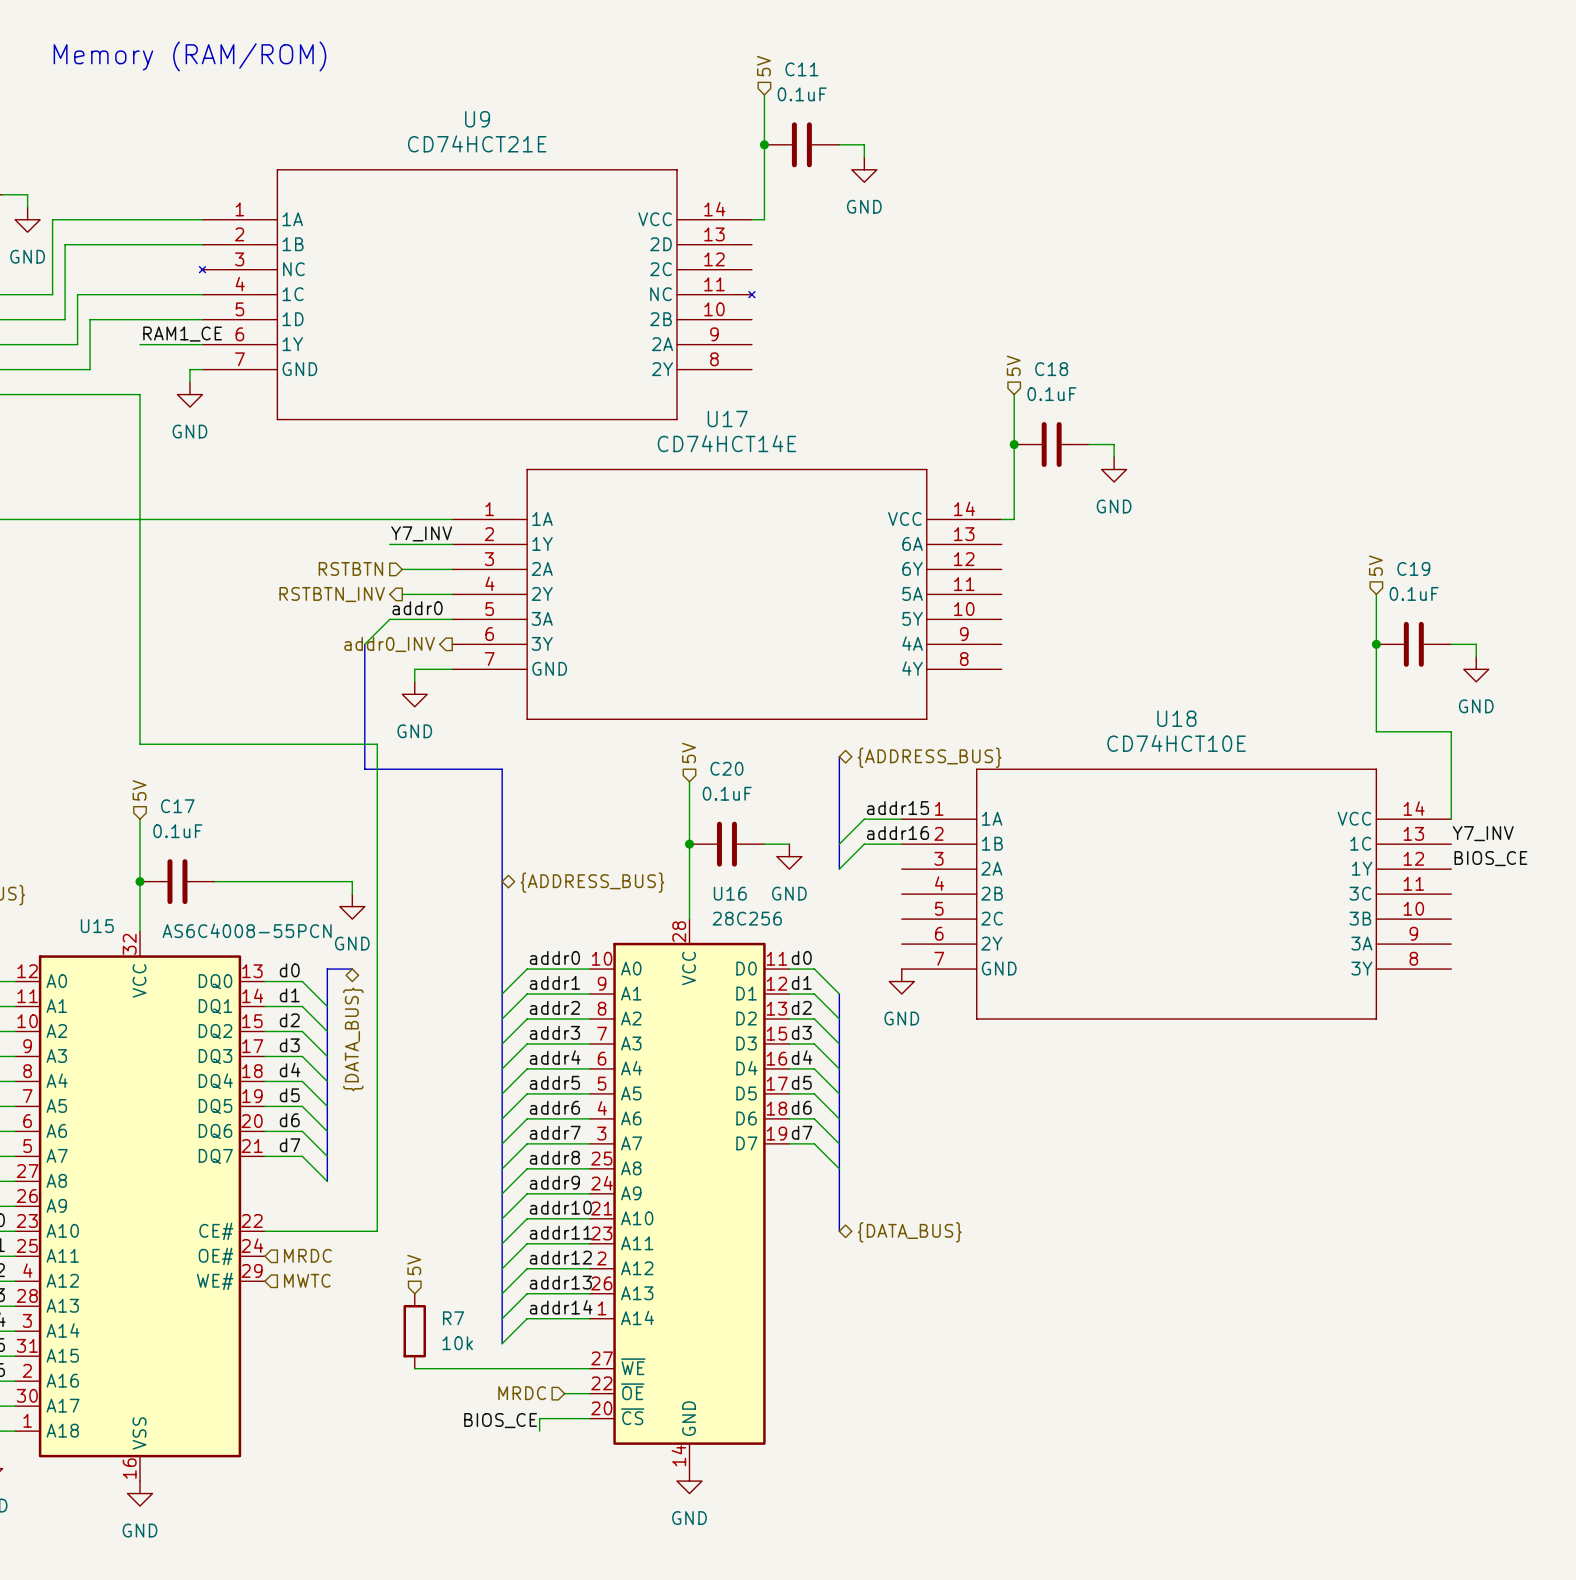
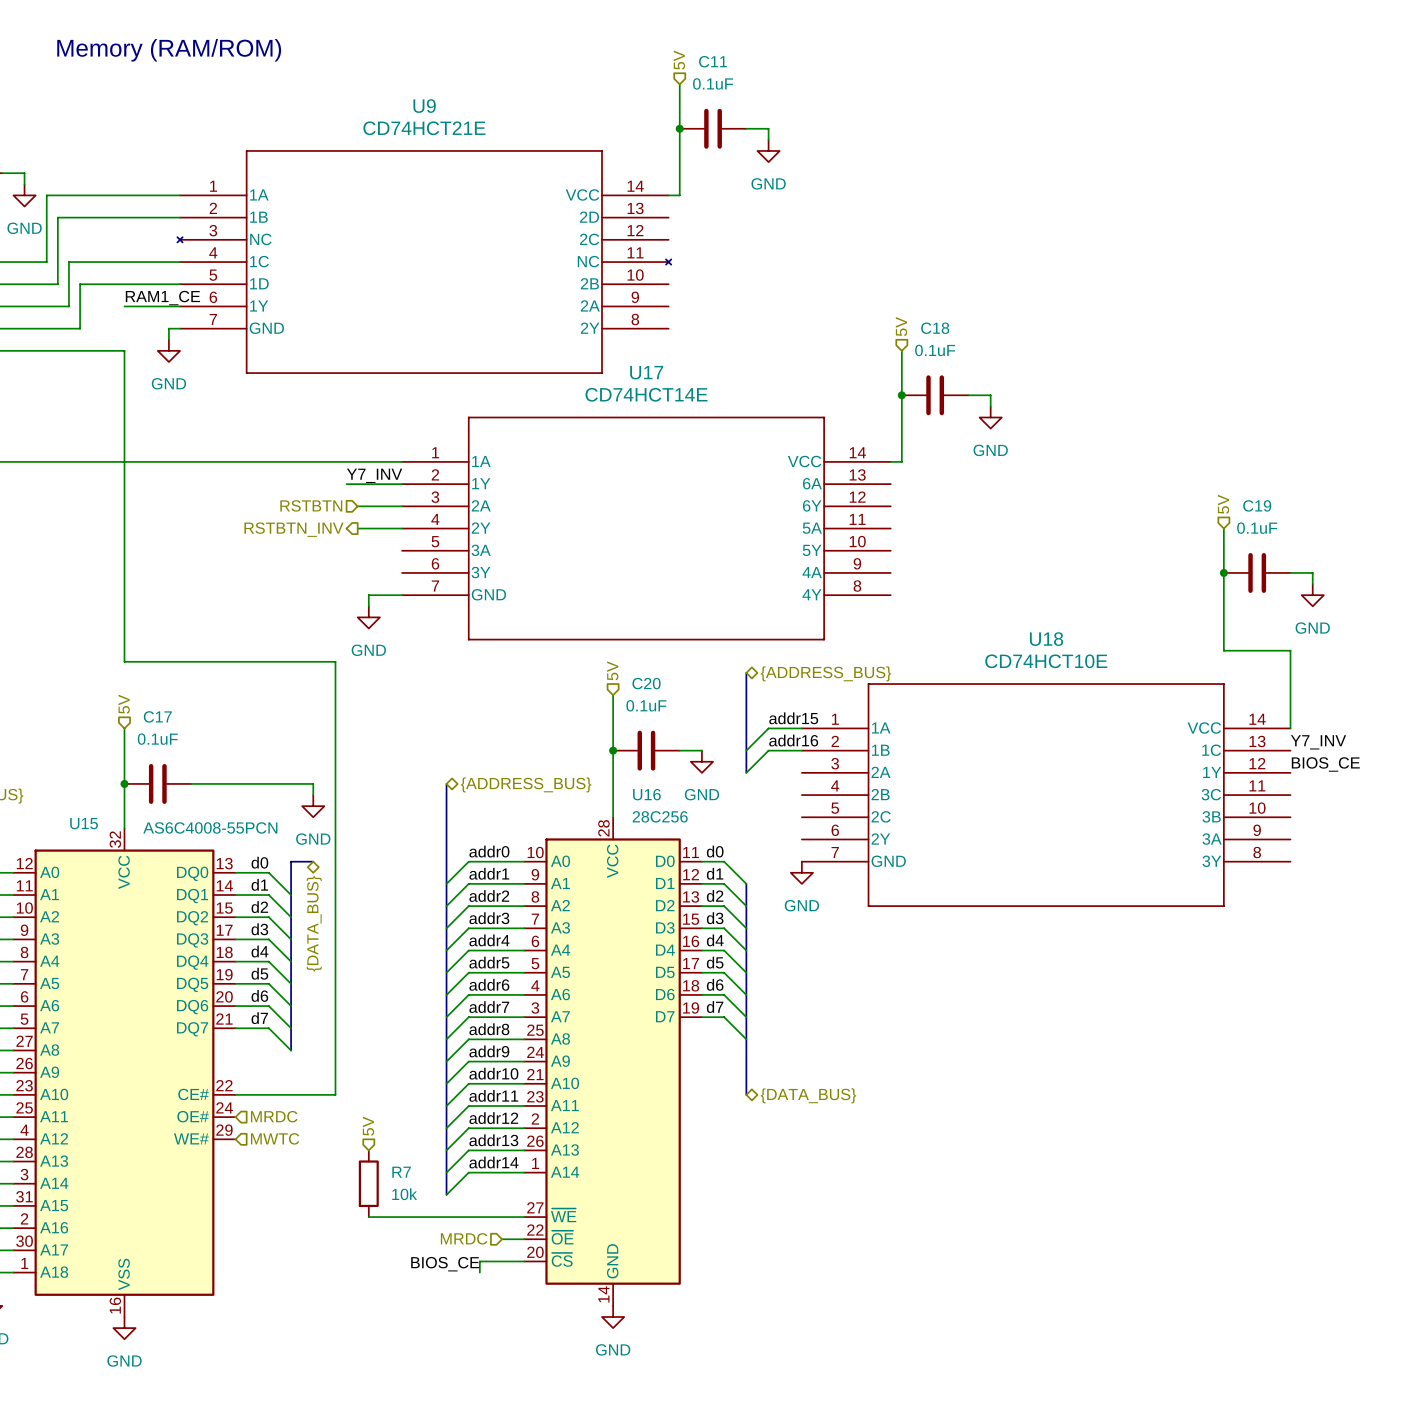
label: addr0 (417, 608) -> none
wire: (452, 619) (389, 619) (364, 644) -> none
bus: (364, 644) (364, 769) (502, 769) (502, 881) -> none
hierarchical label: addr0_INV (389, 644) -> none

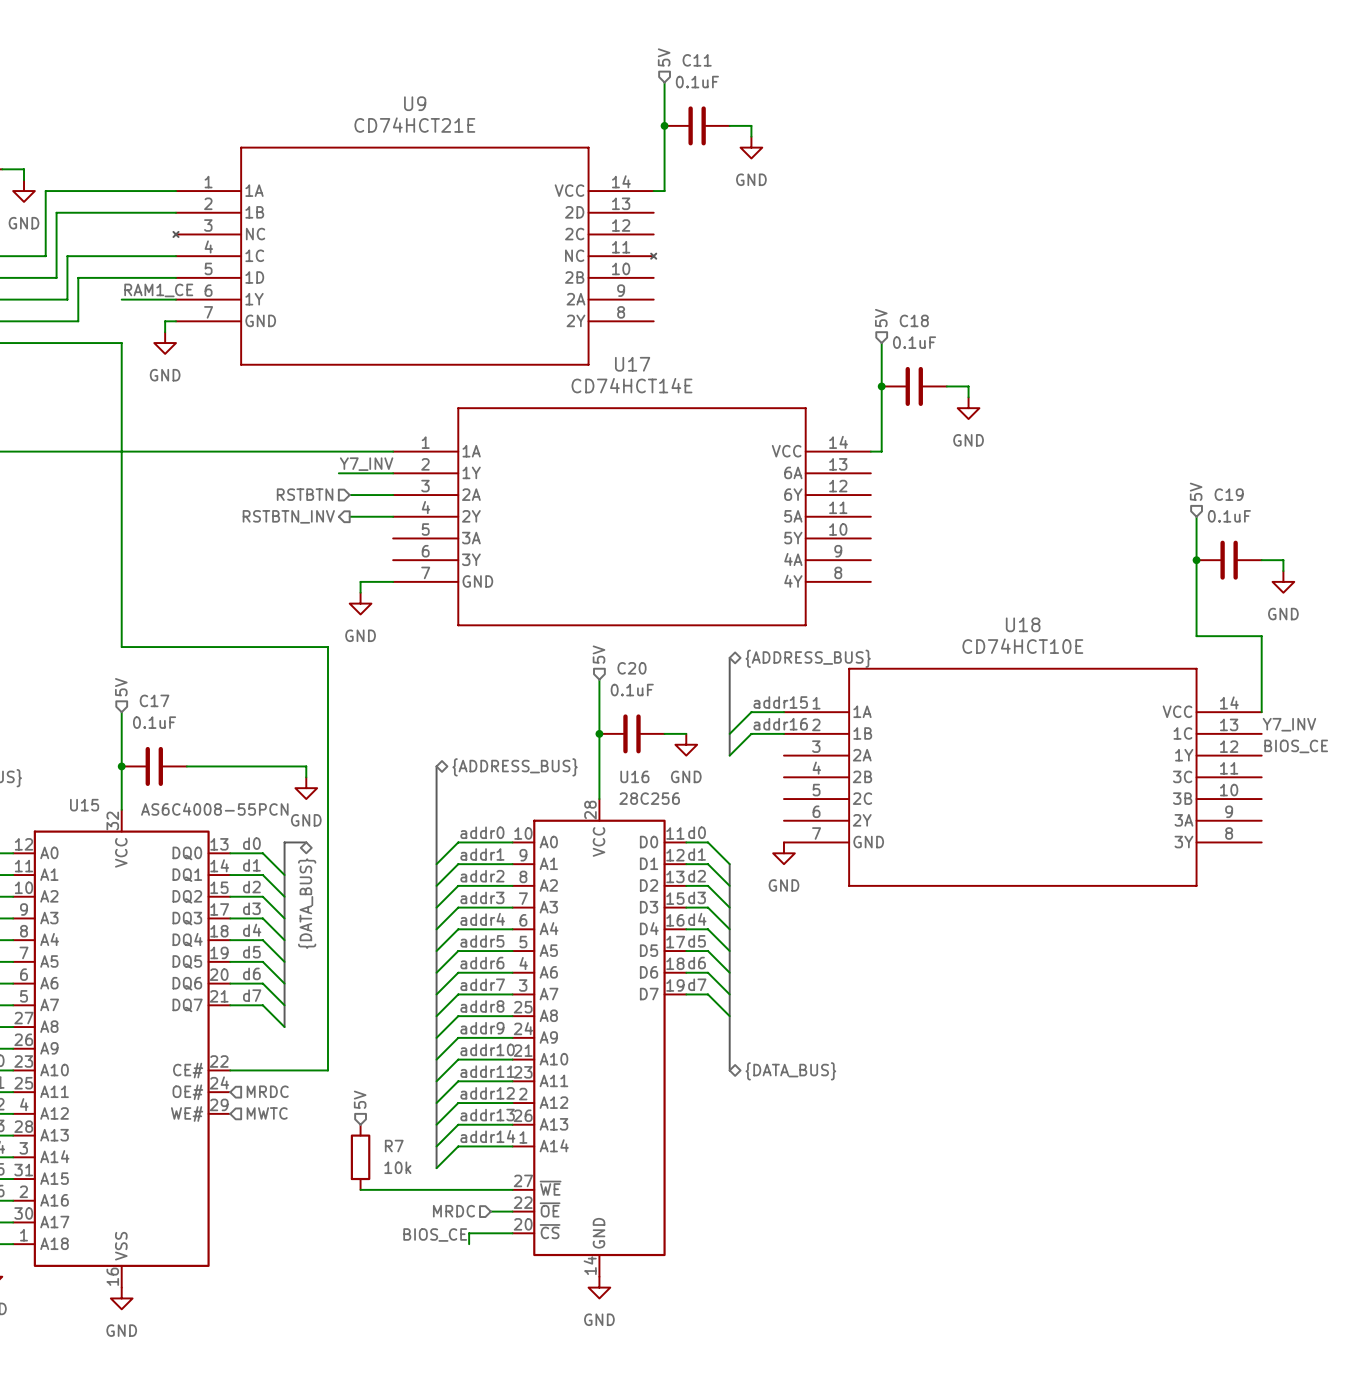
text: Memory (RAM/ROM) (169, 50) -> none

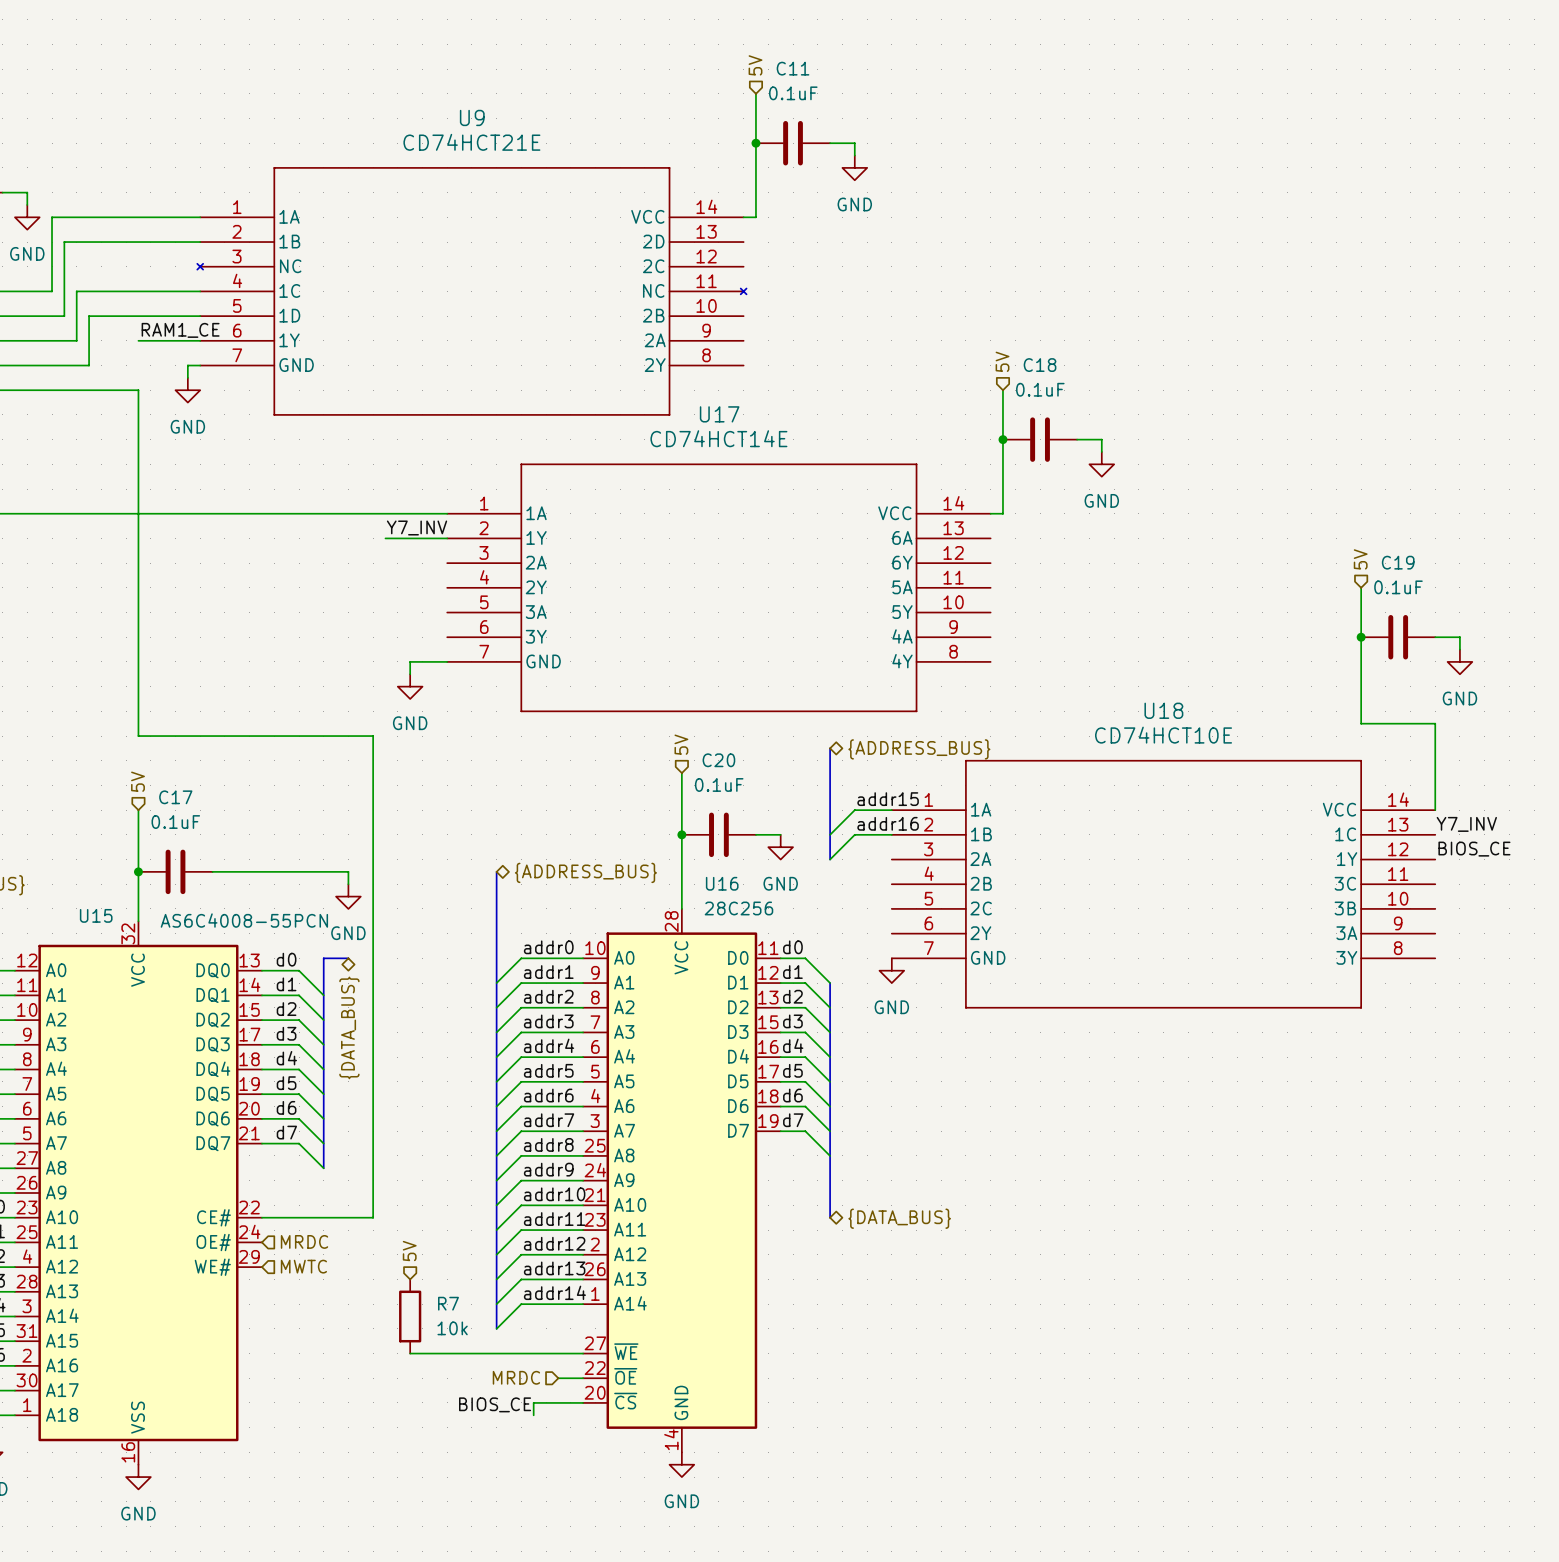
hierarchical label: RSTBTN (305, 494) -> none
wire: (349, 495) (393, 495) -> none
hierarchical label: RSTBTN_INV (288, 516) -> none
wire: (349, 516) (393, 516) -> none

